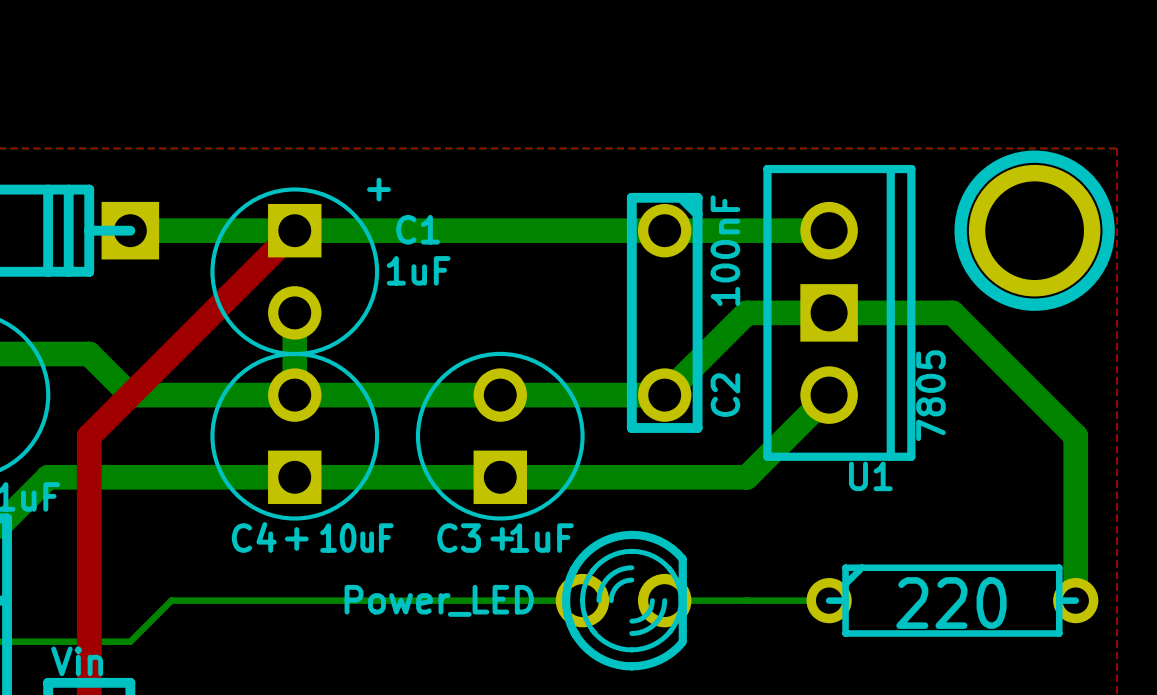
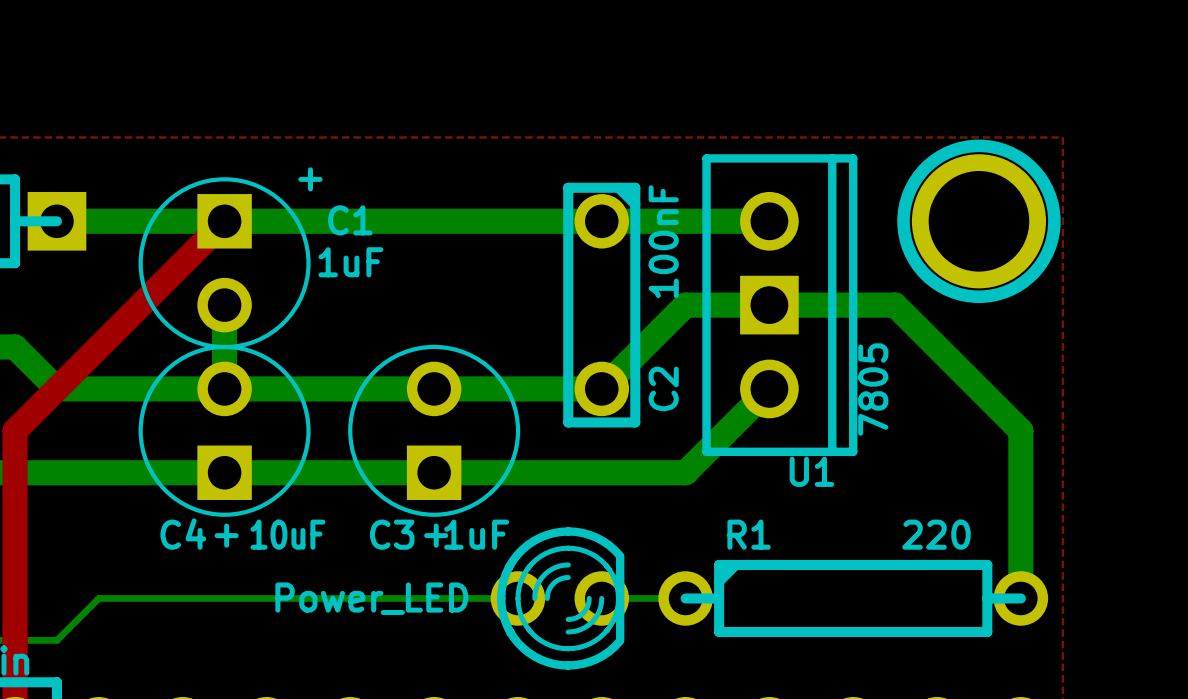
bottom track: (746, 600) (829, 600) -> none
R1: none -> 220 (853, 598)
part: 220 (952, 600) -> none

